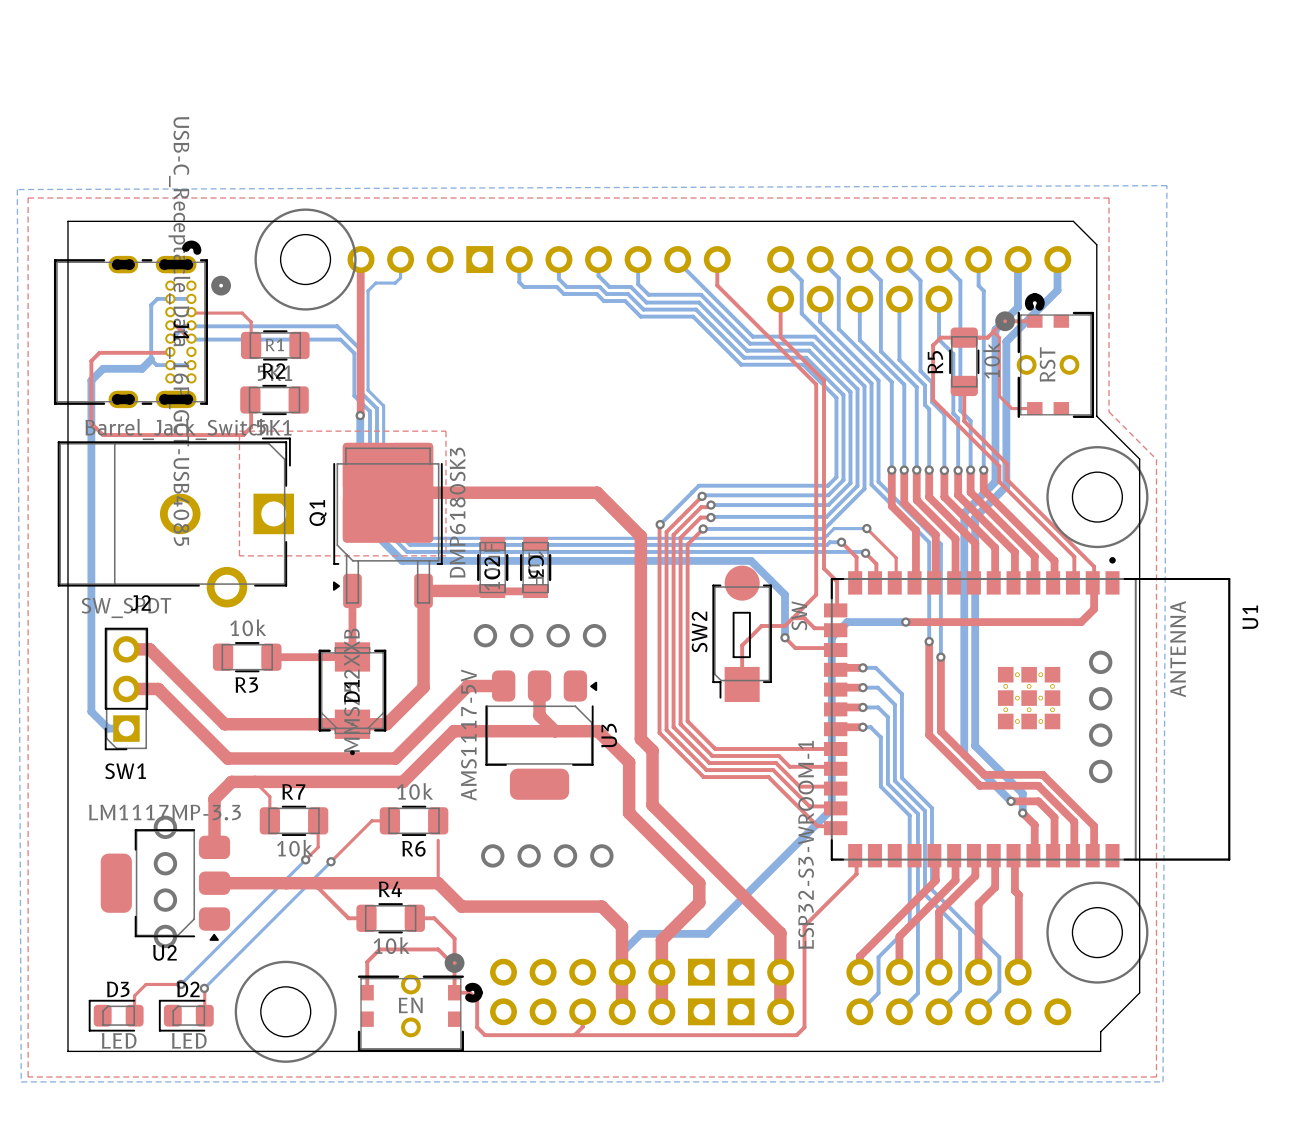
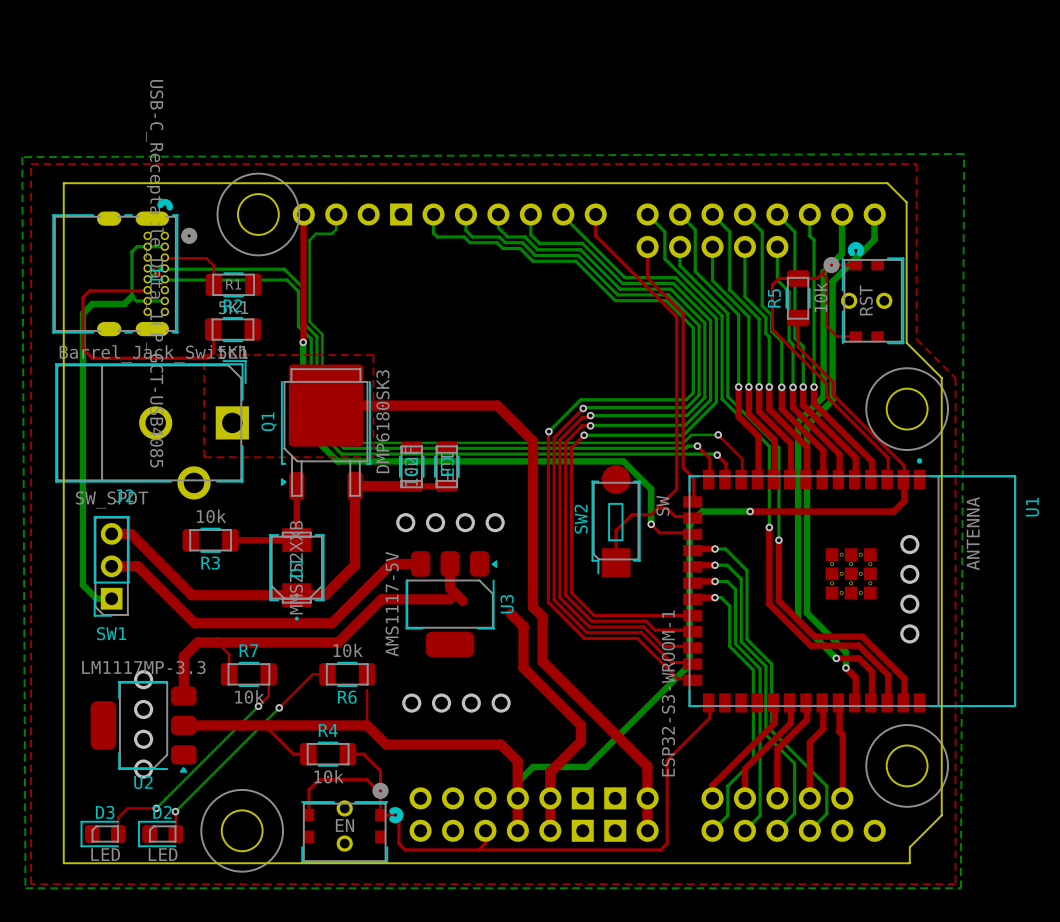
top track: (453, 731) (597, 731) (613, 746) -> (379, 600) (381, 599) (450, 599)

